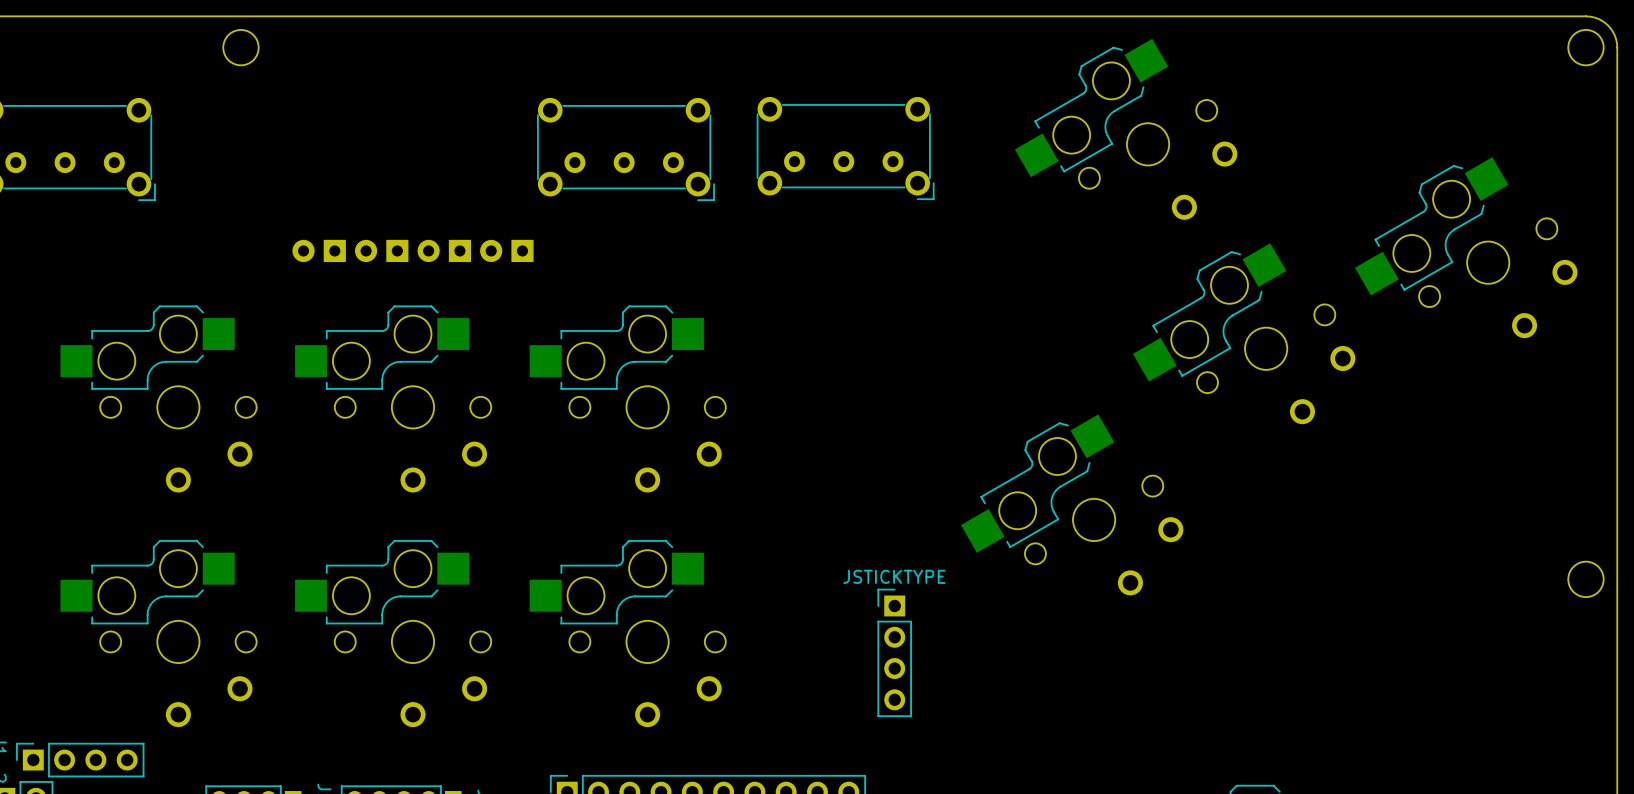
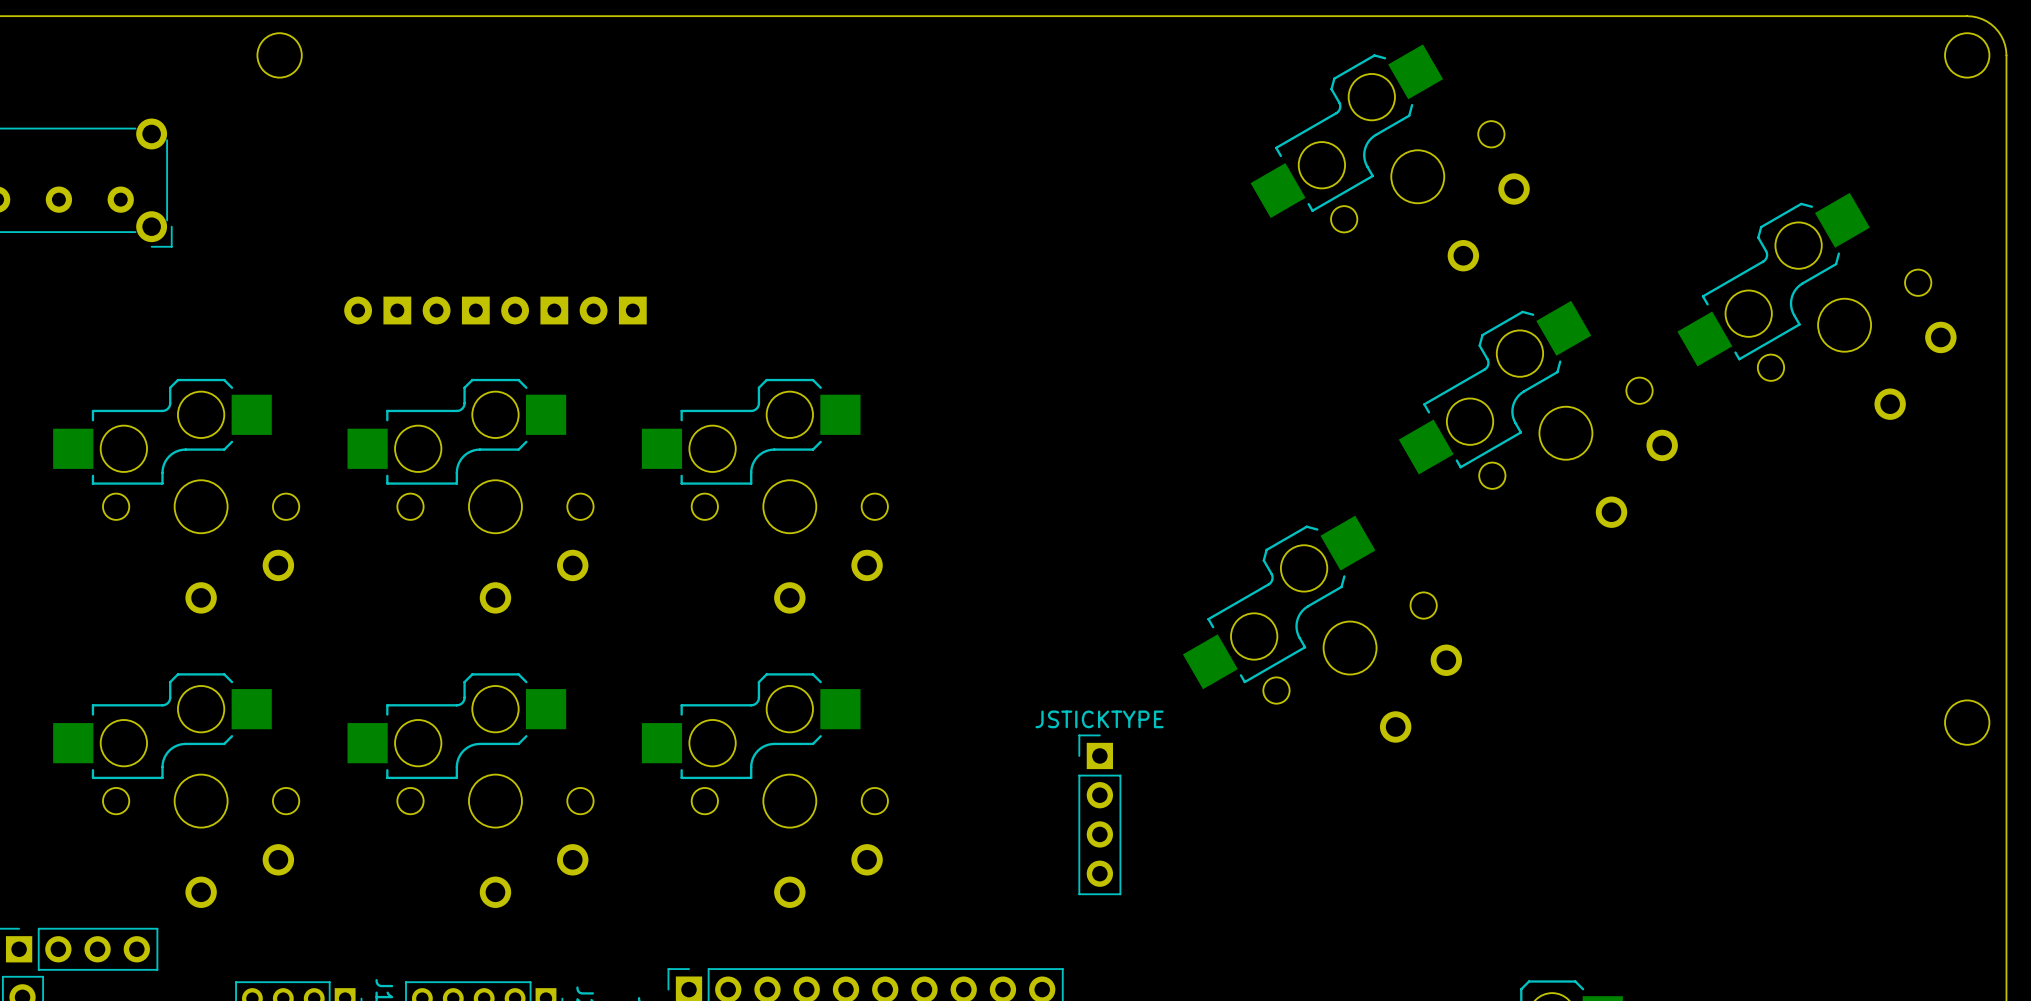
part: (845, 148) -> none
part: (626, 149) -> none

